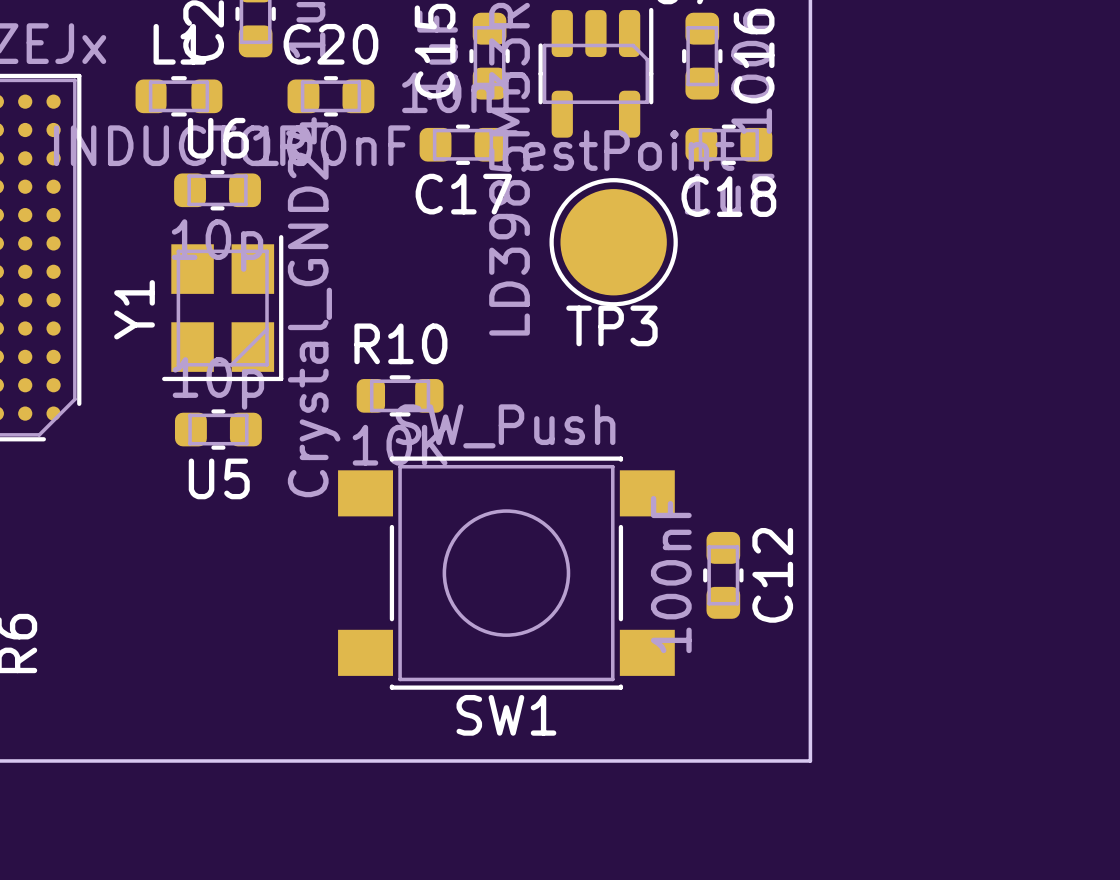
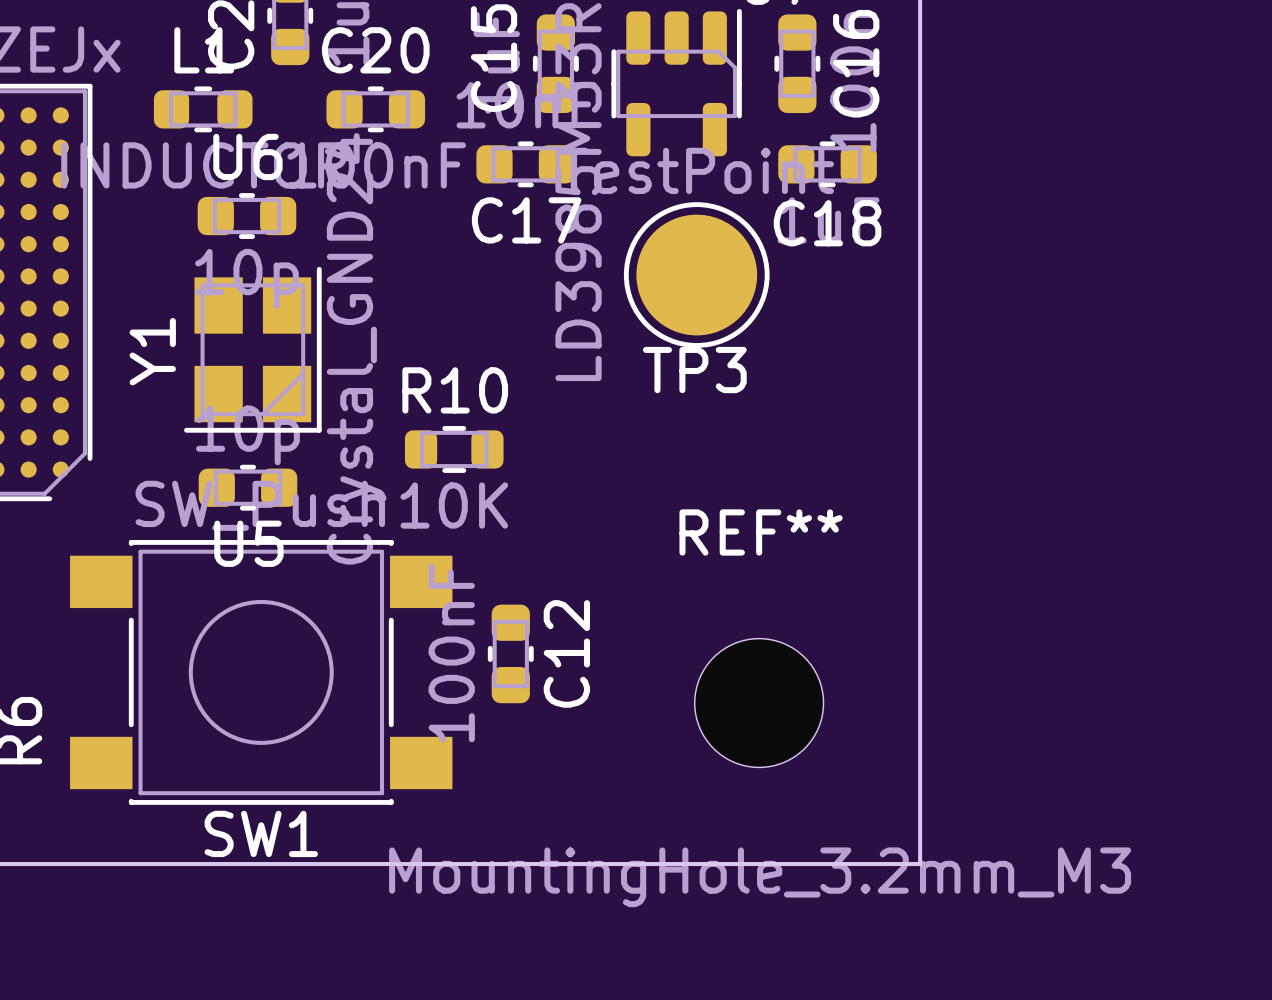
SW1 position: (506, 573) -> (261, 672)
C12 position: (723, 575) -> (510, 653)
REF**: none -> MountingHole_3.2mm_M3 (759, 703)

